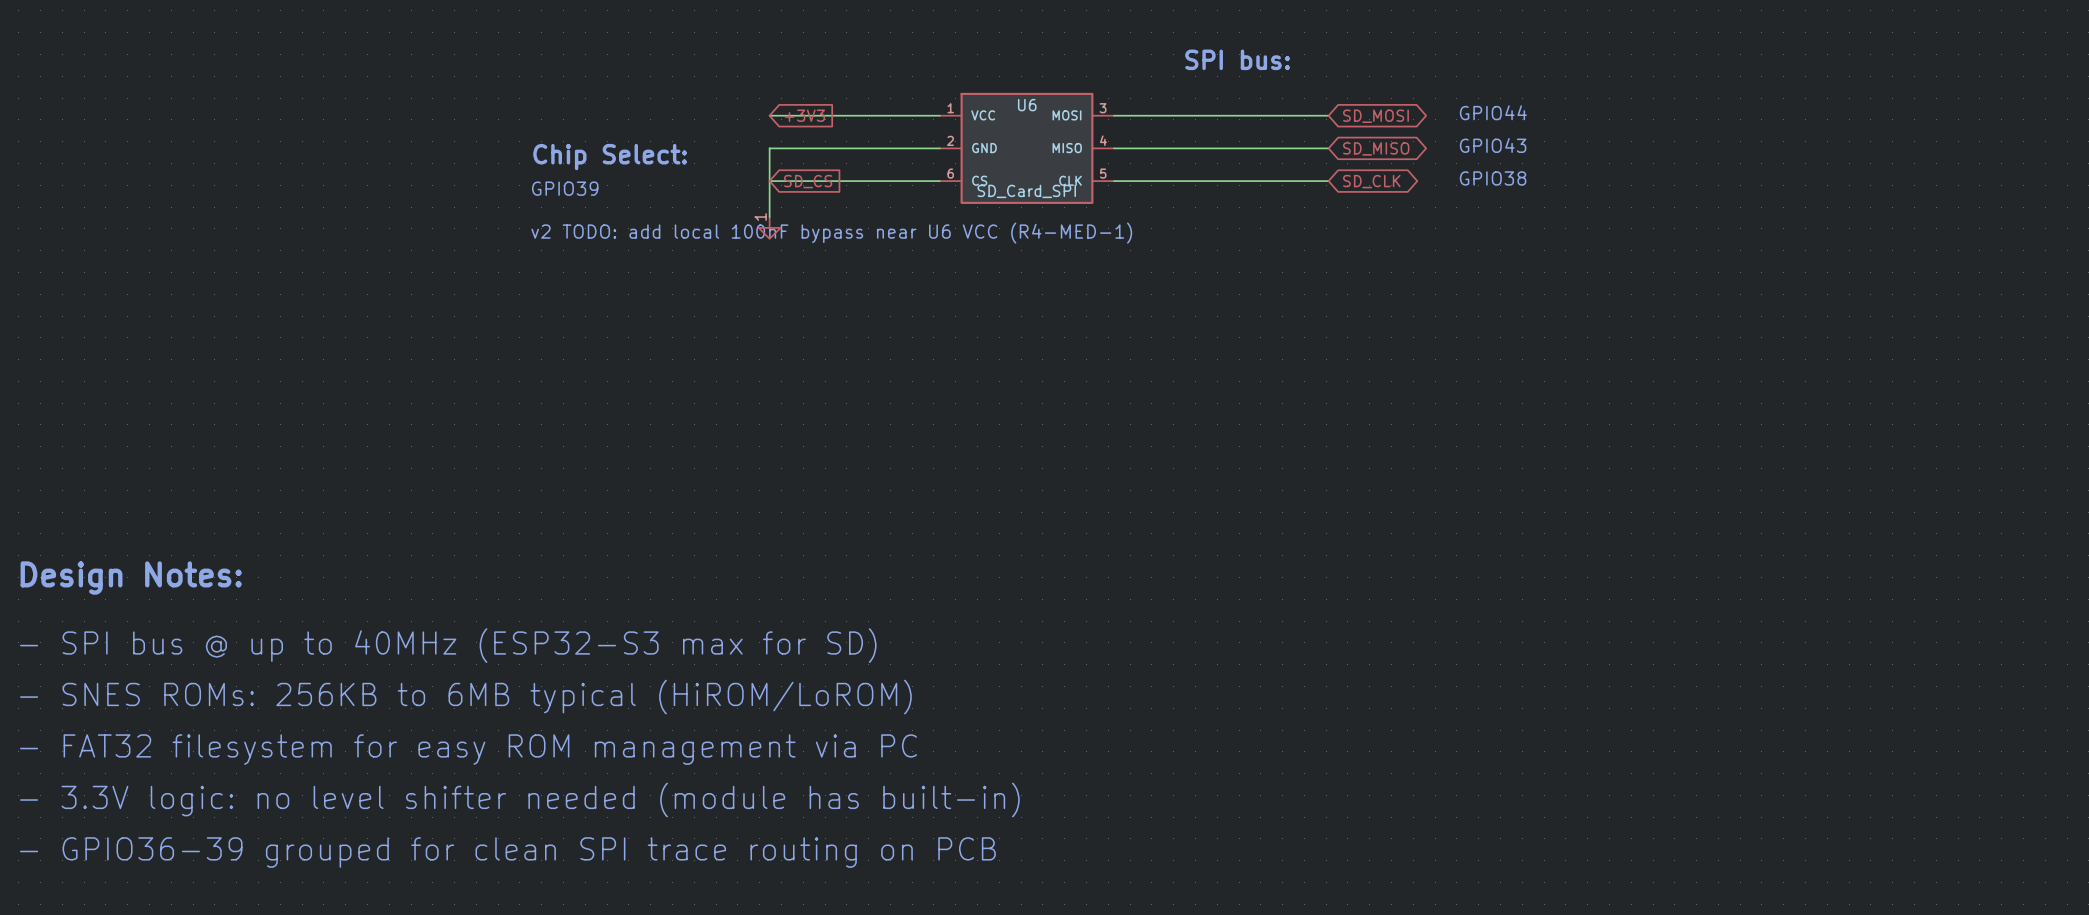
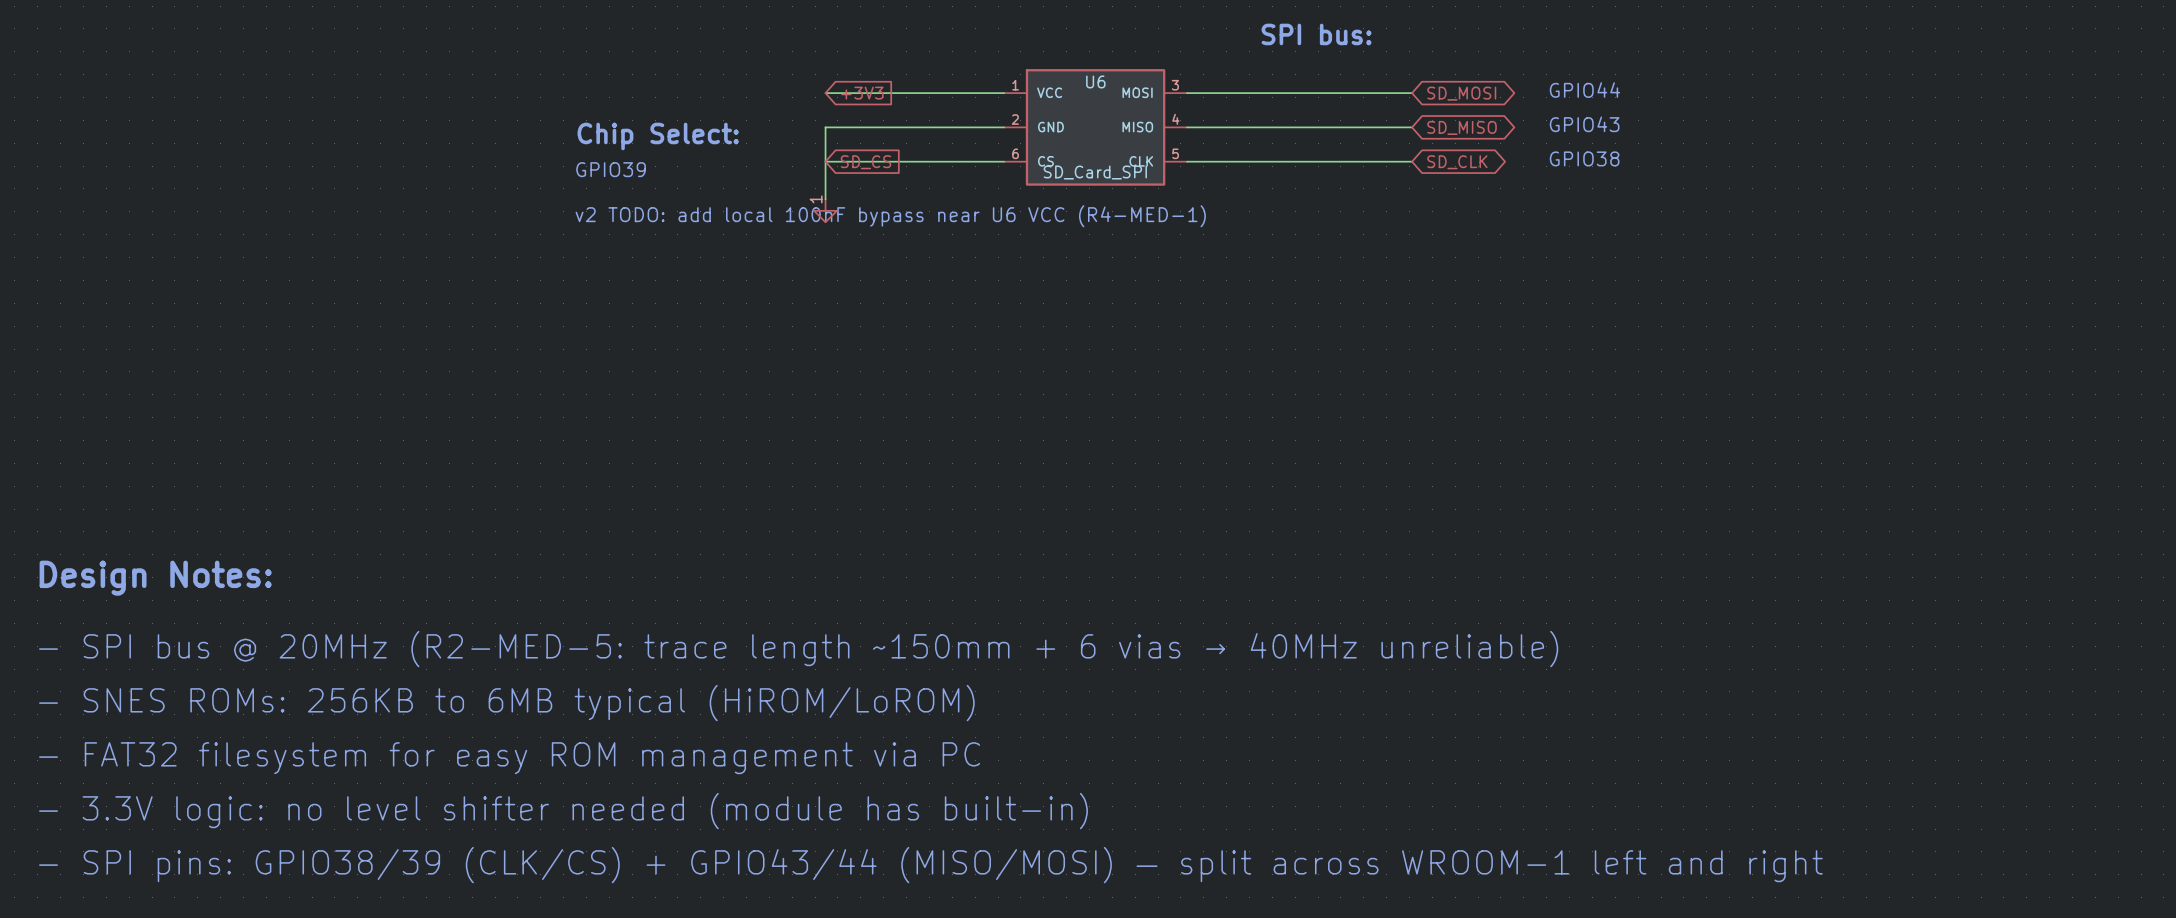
text: - SPI bus @ up to 40MHz (ESP32-S3 max for SD) (448, 645) -> - SPI bus @ 20MHz (R2-MED-5: trace length ~150mm + 6 vias → 40MHz unreliable) (798, 649)
text: - GPIO36-39 grouped for clean SPI trace routing on PCB (507, 852) -> - SPI pins: GPIO38/39 (CLK/CS) + GPIO43/44 (MISO/MOSI) — split across WROOM-1 left and right (930, 865)

